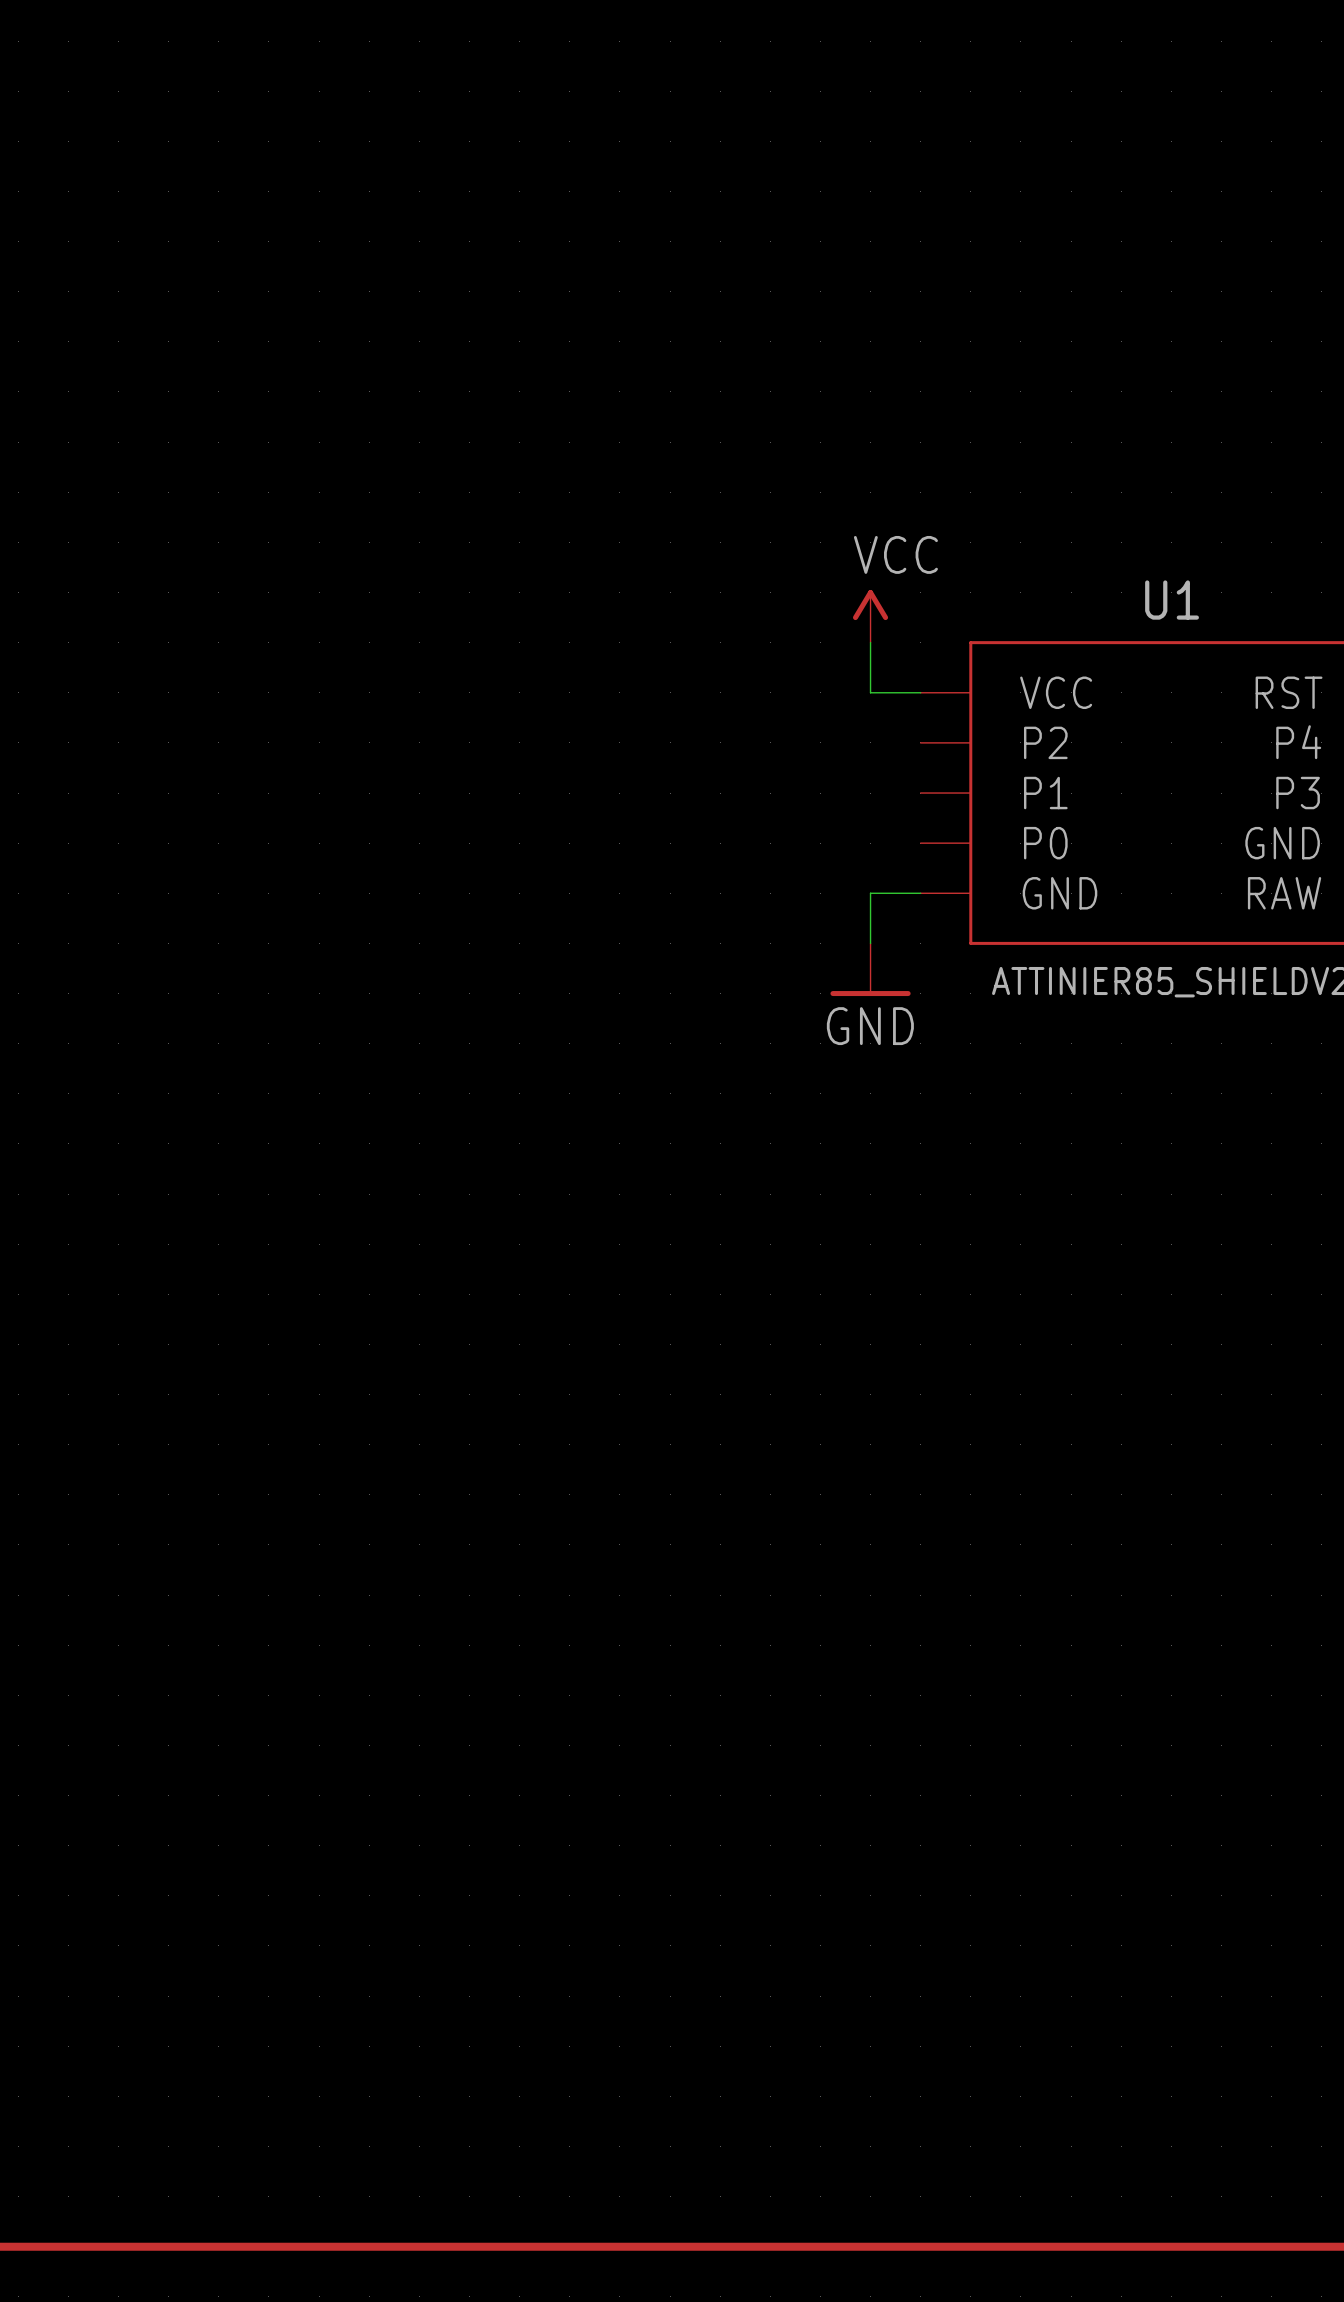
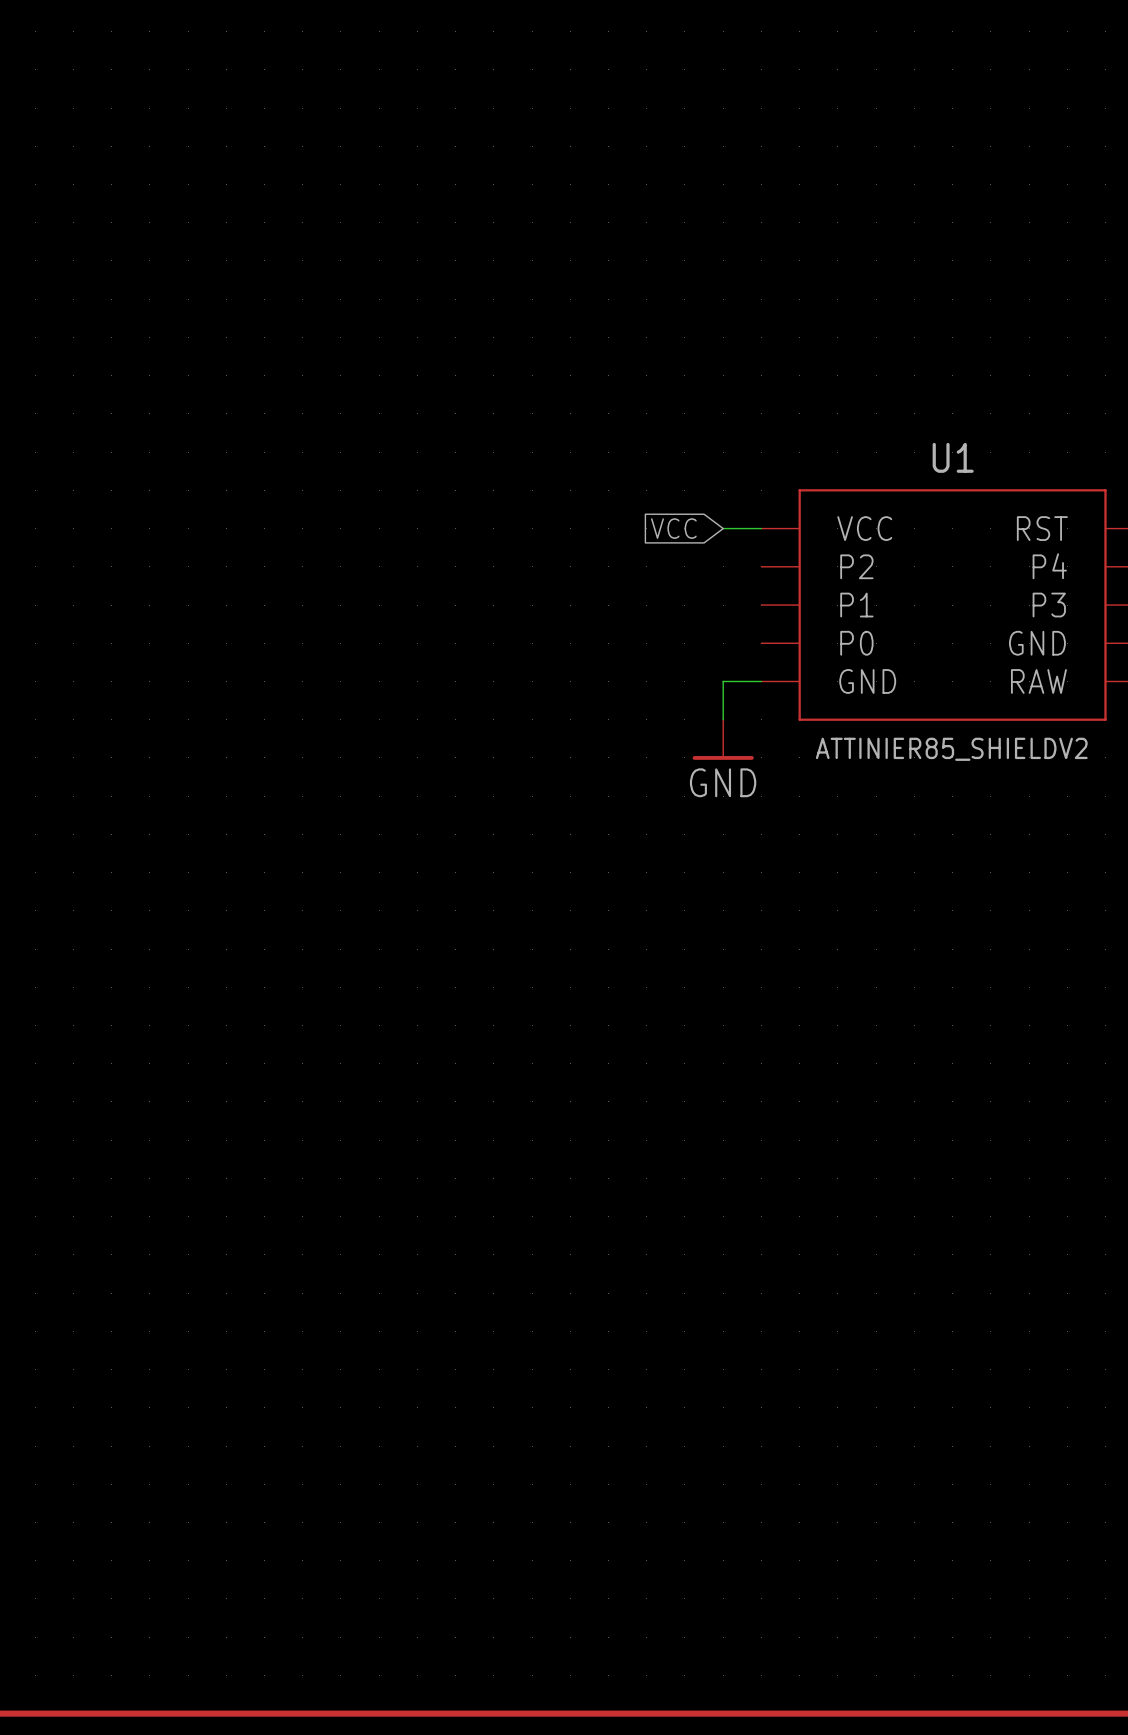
power symbol: VCC (870, 616) -> none
wire: (870, 642) (870, 692) -> none
global label: none -> VCC (673, 528)

